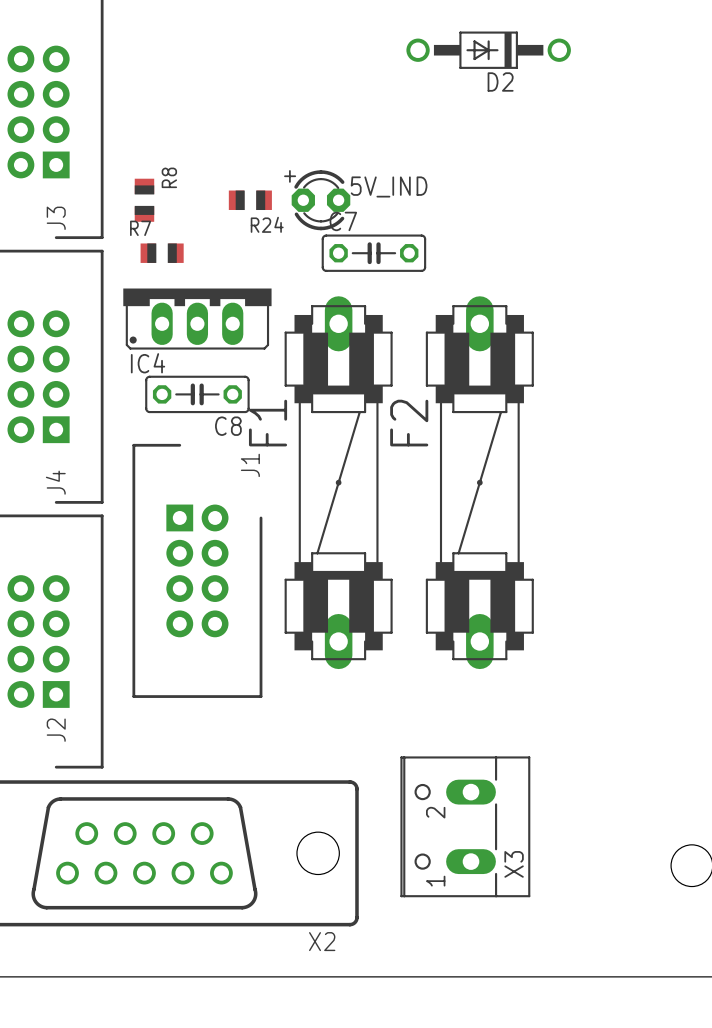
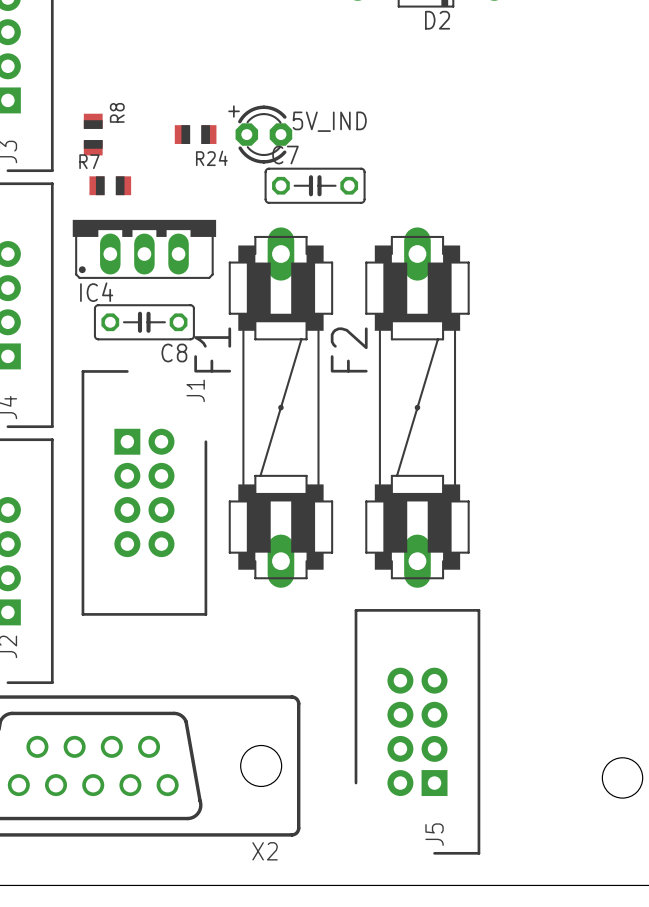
J5: none -> (417, 731)
X3: (465, 826) -> none

